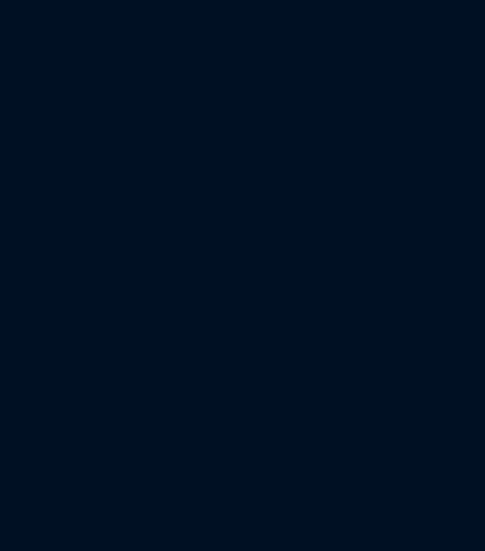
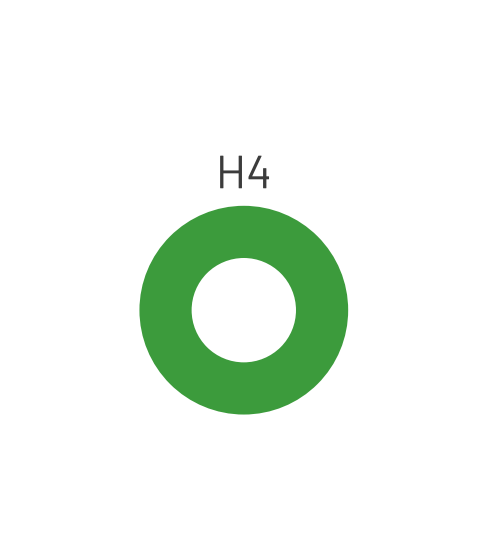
H4: none -> (243, 310)

